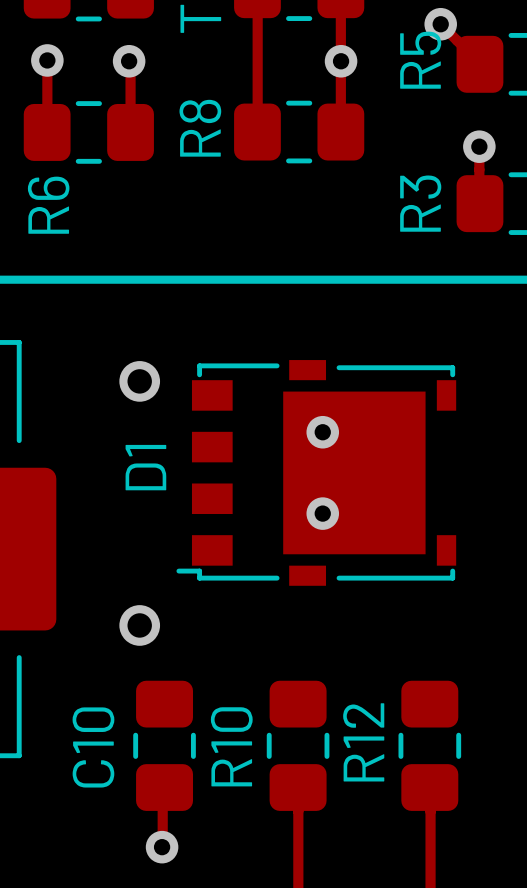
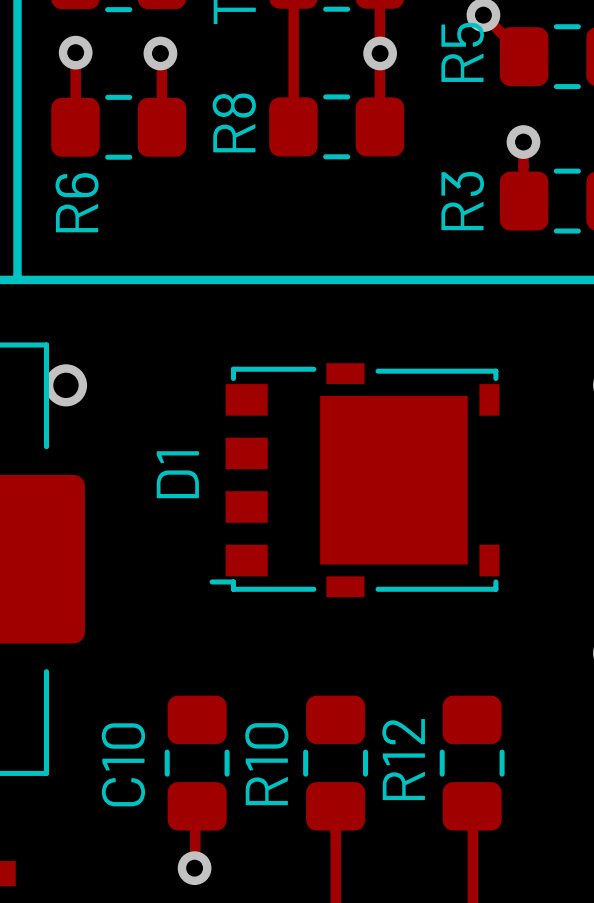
via position: (139, 381) -> (65, 385)
via: (322, 432) -> none
via: (322, 513) -> none
via: (139, 625) -> none

